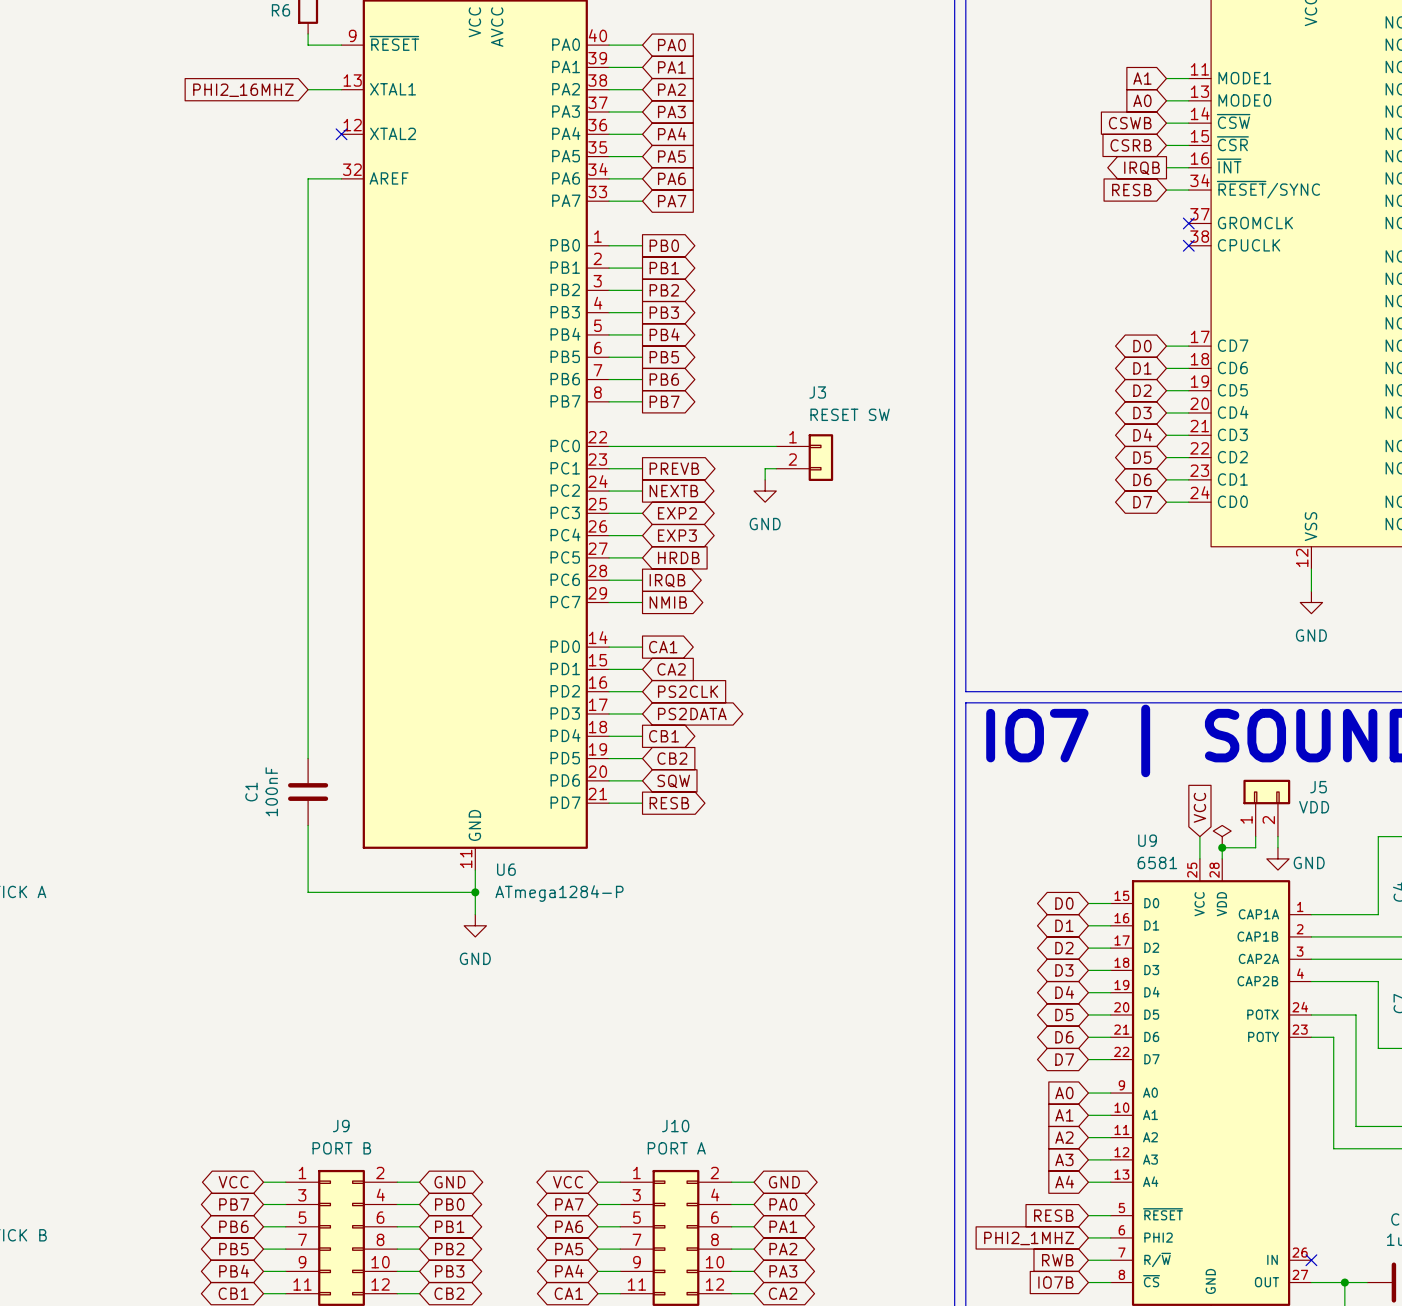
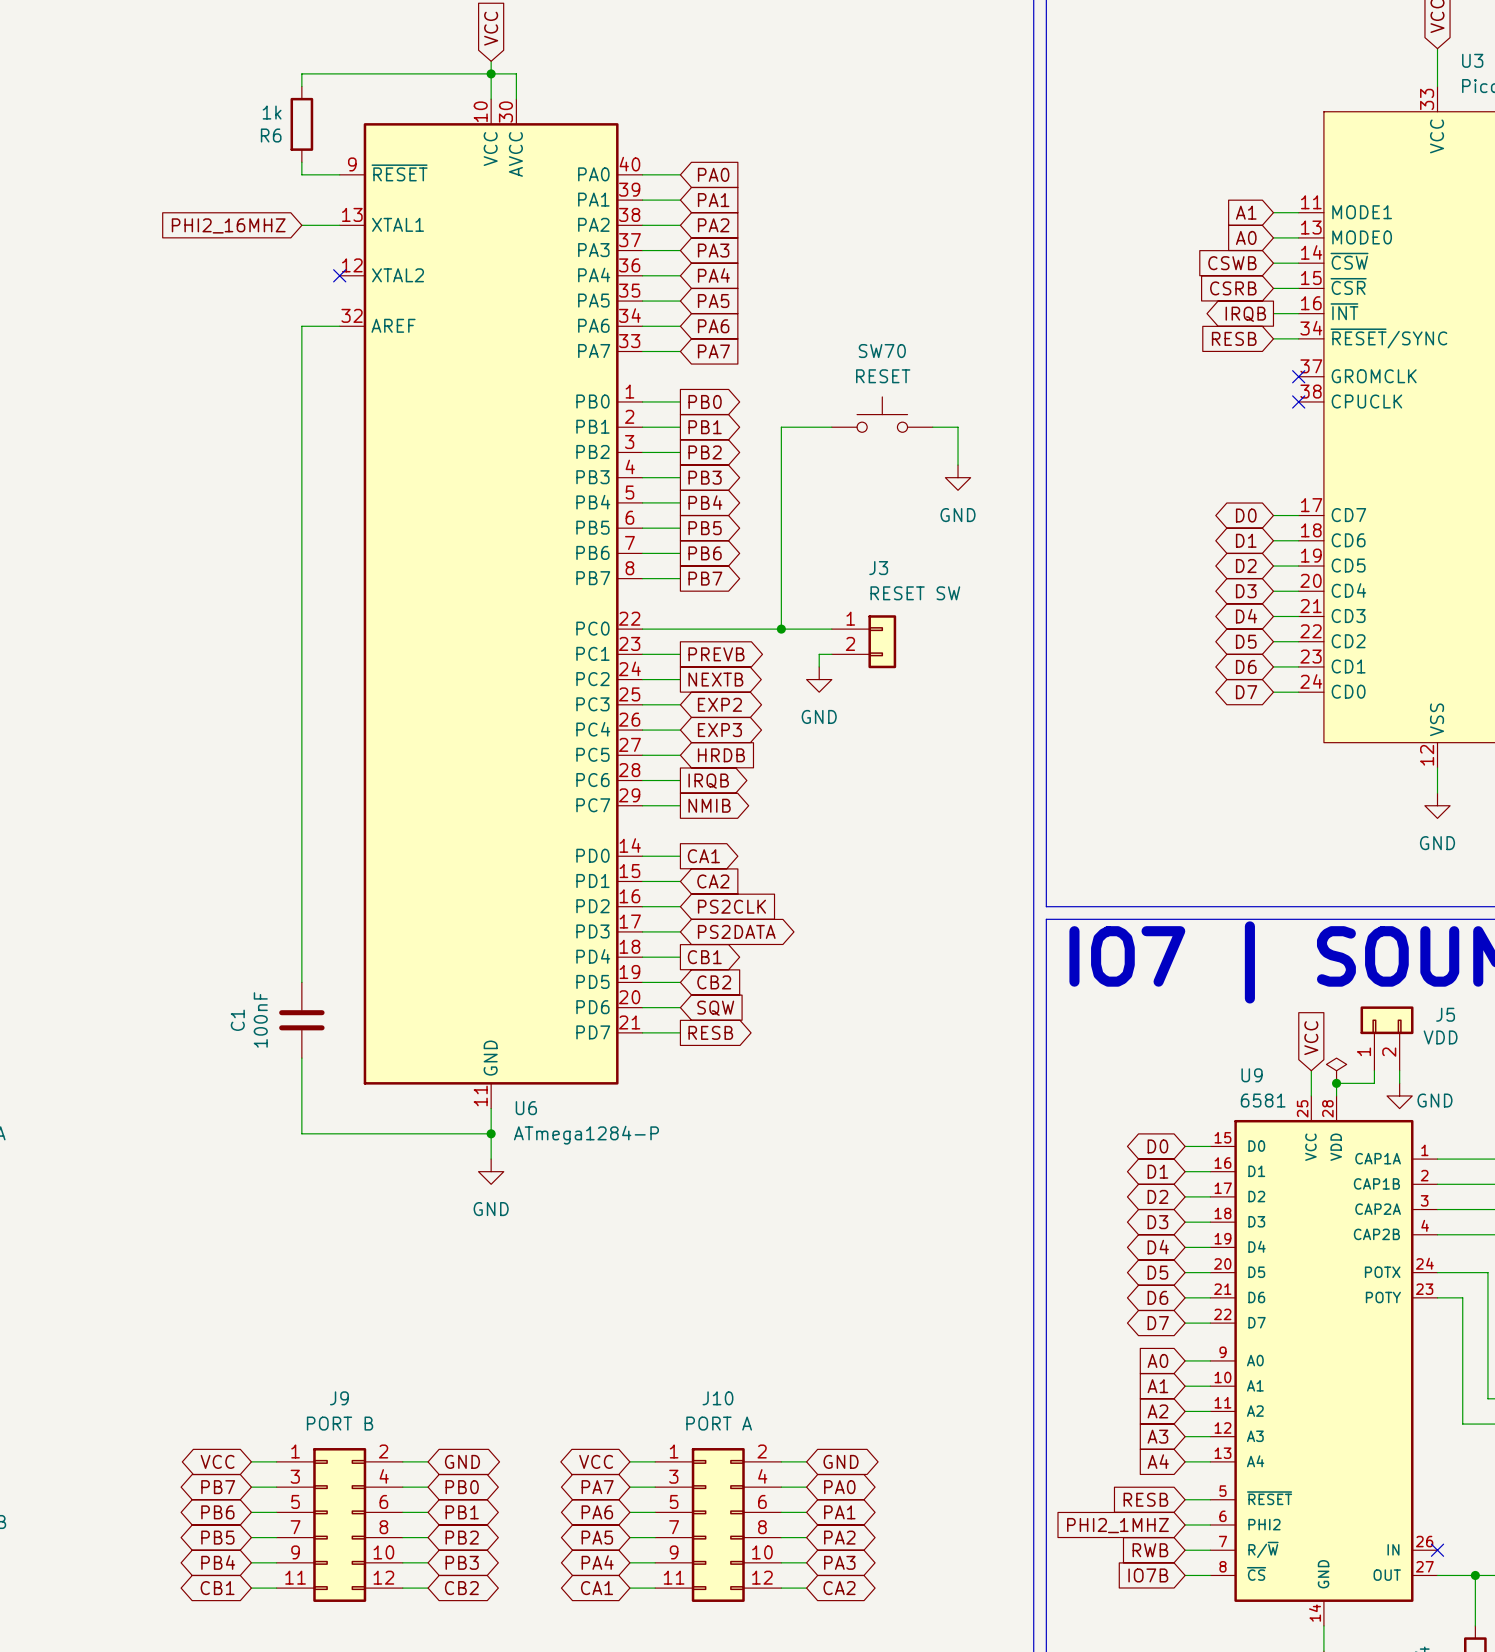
SW70: none -> RESET (882, 414)
wire: none -> (831, 427) (781, 427) (781, 629)
wire: none -> (932, 427) (958, 427) (958, 465)
power symbol: none -> GND (958, 477)
junction: none -> (781, 629)

